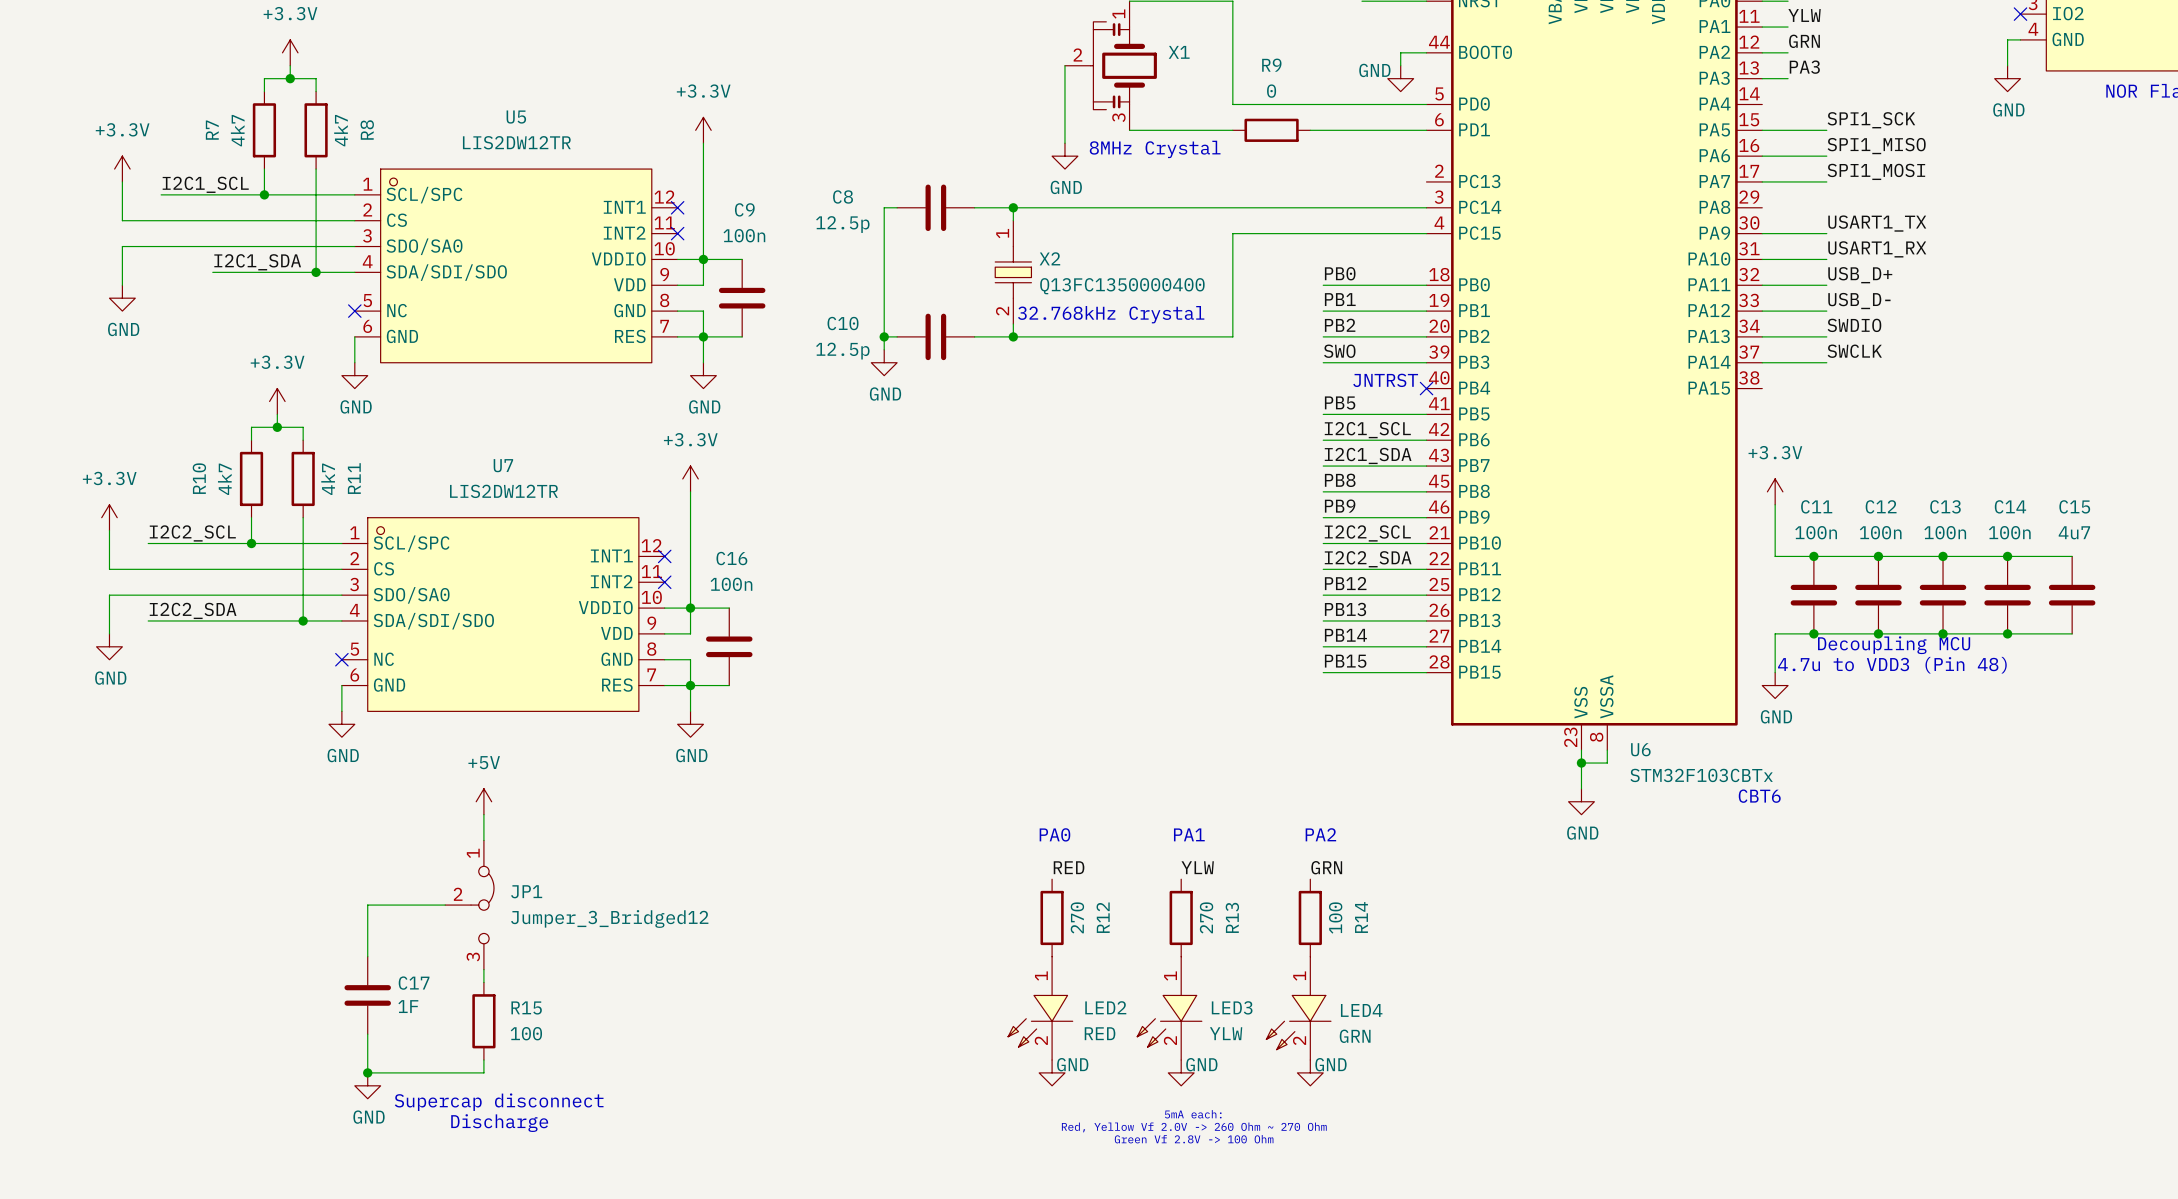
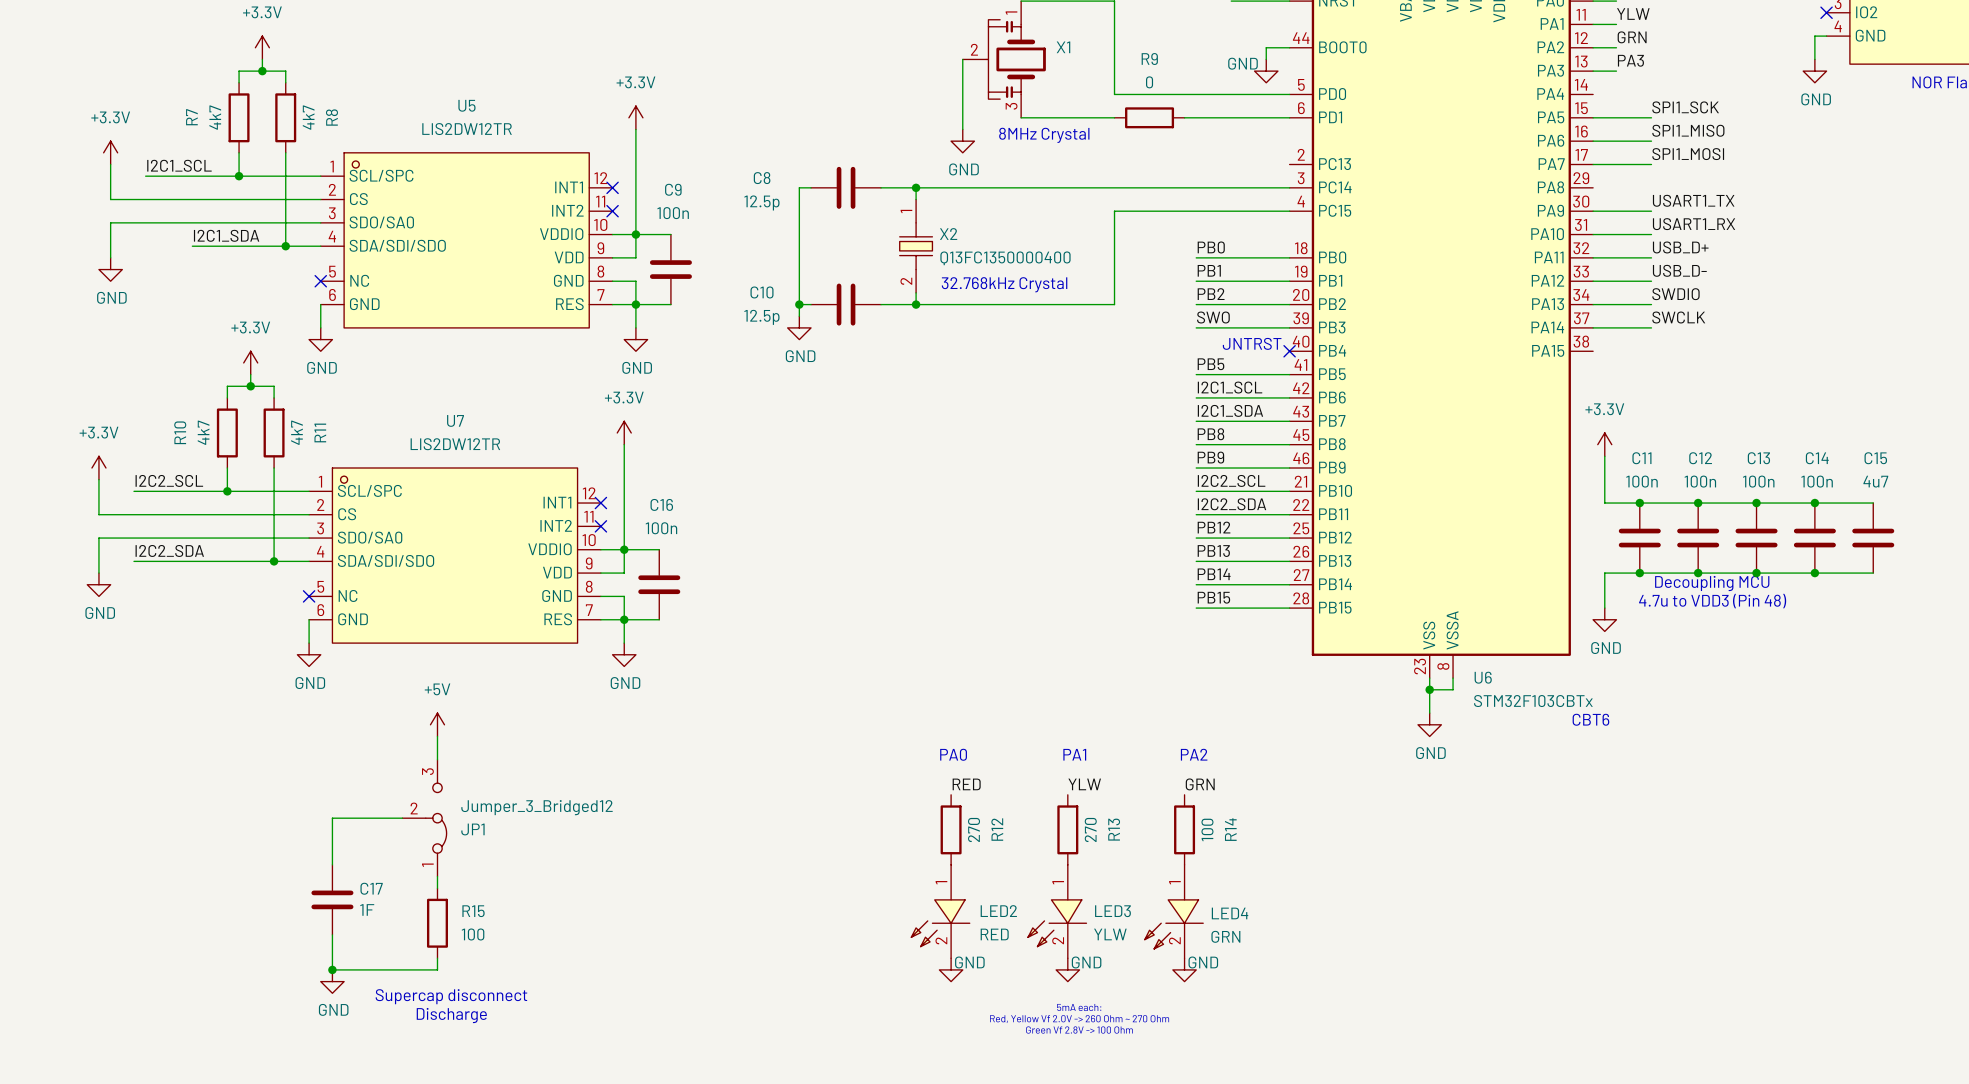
JP1 flip: as is (482, 905) -> up-down (436, 818)

